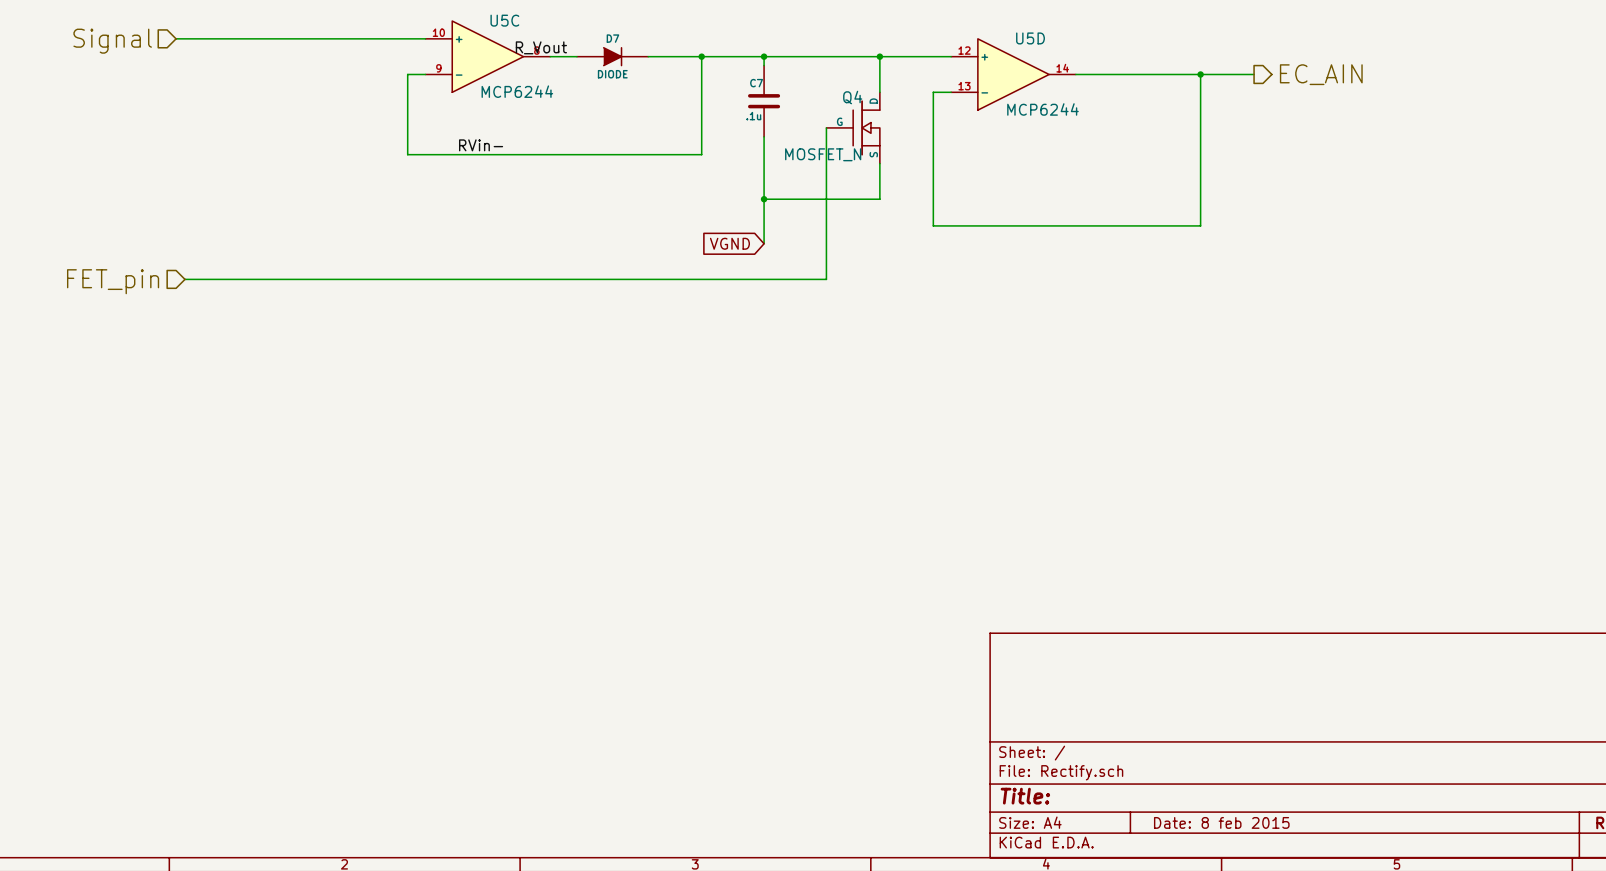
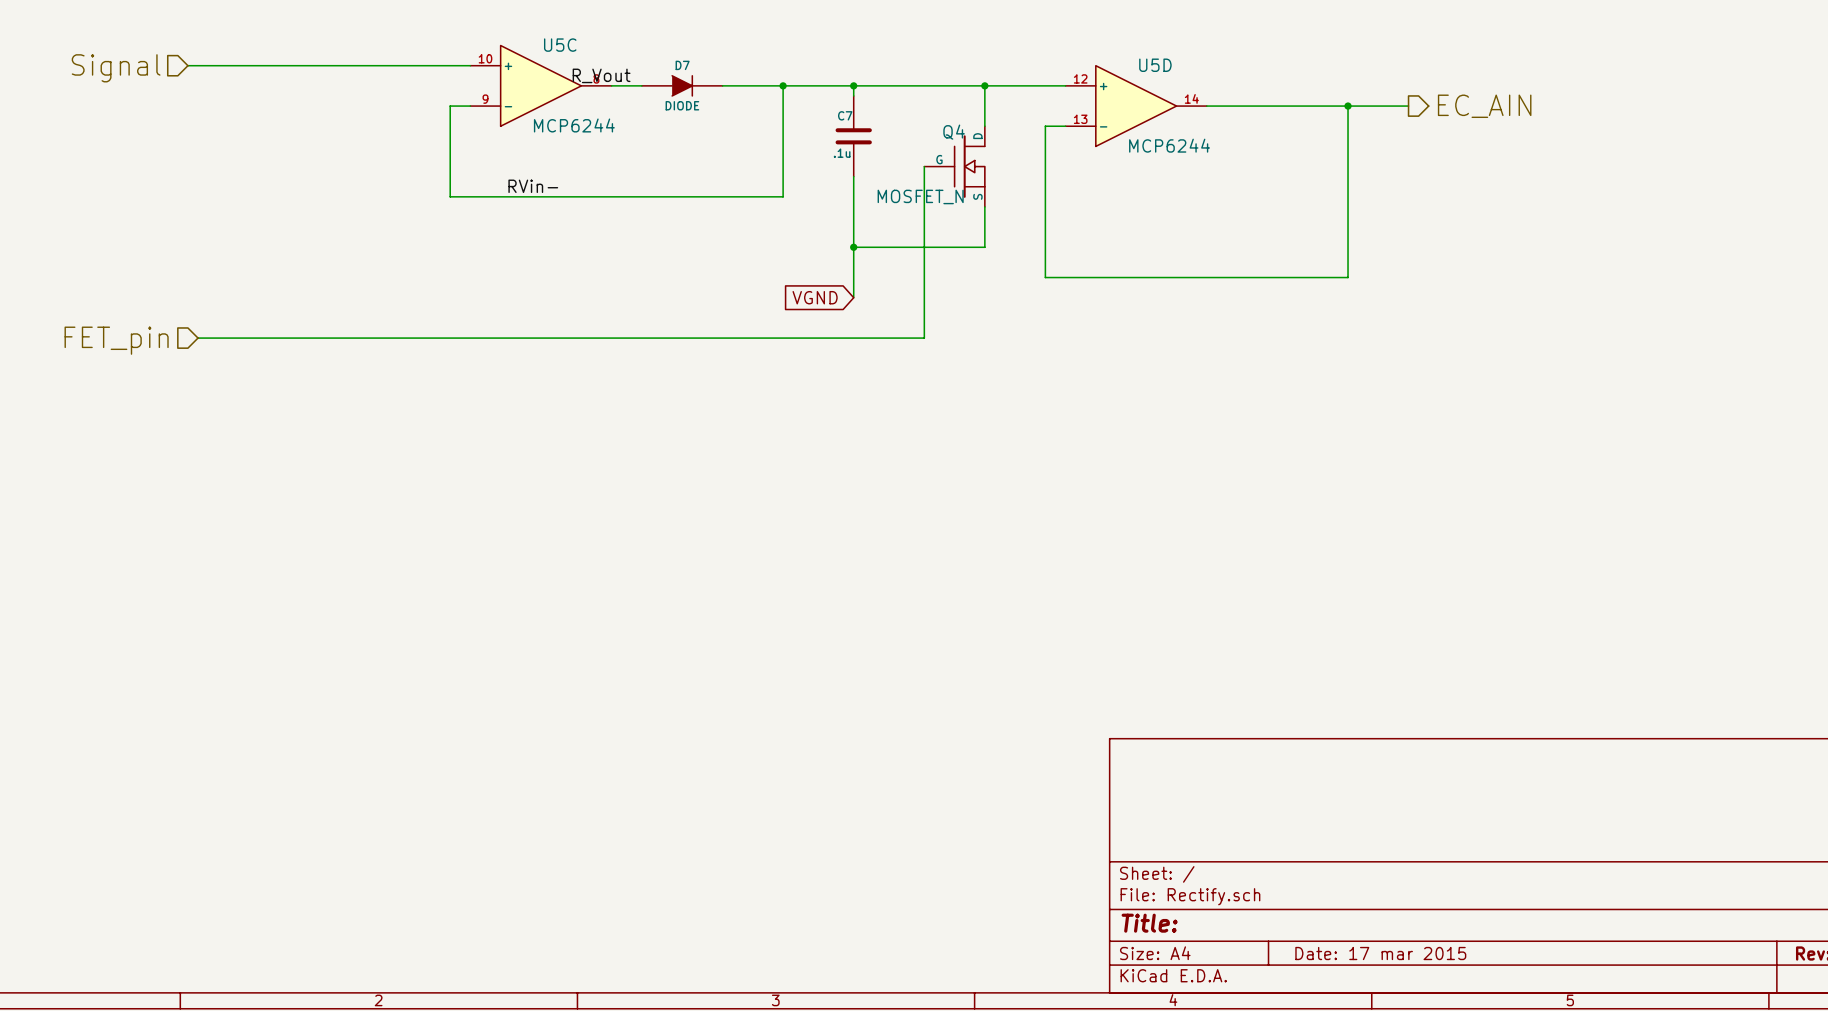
title block: Date: 8 feb 2015 (1221, 822) -> Date: 17 mar 2015 (1380, 953)

